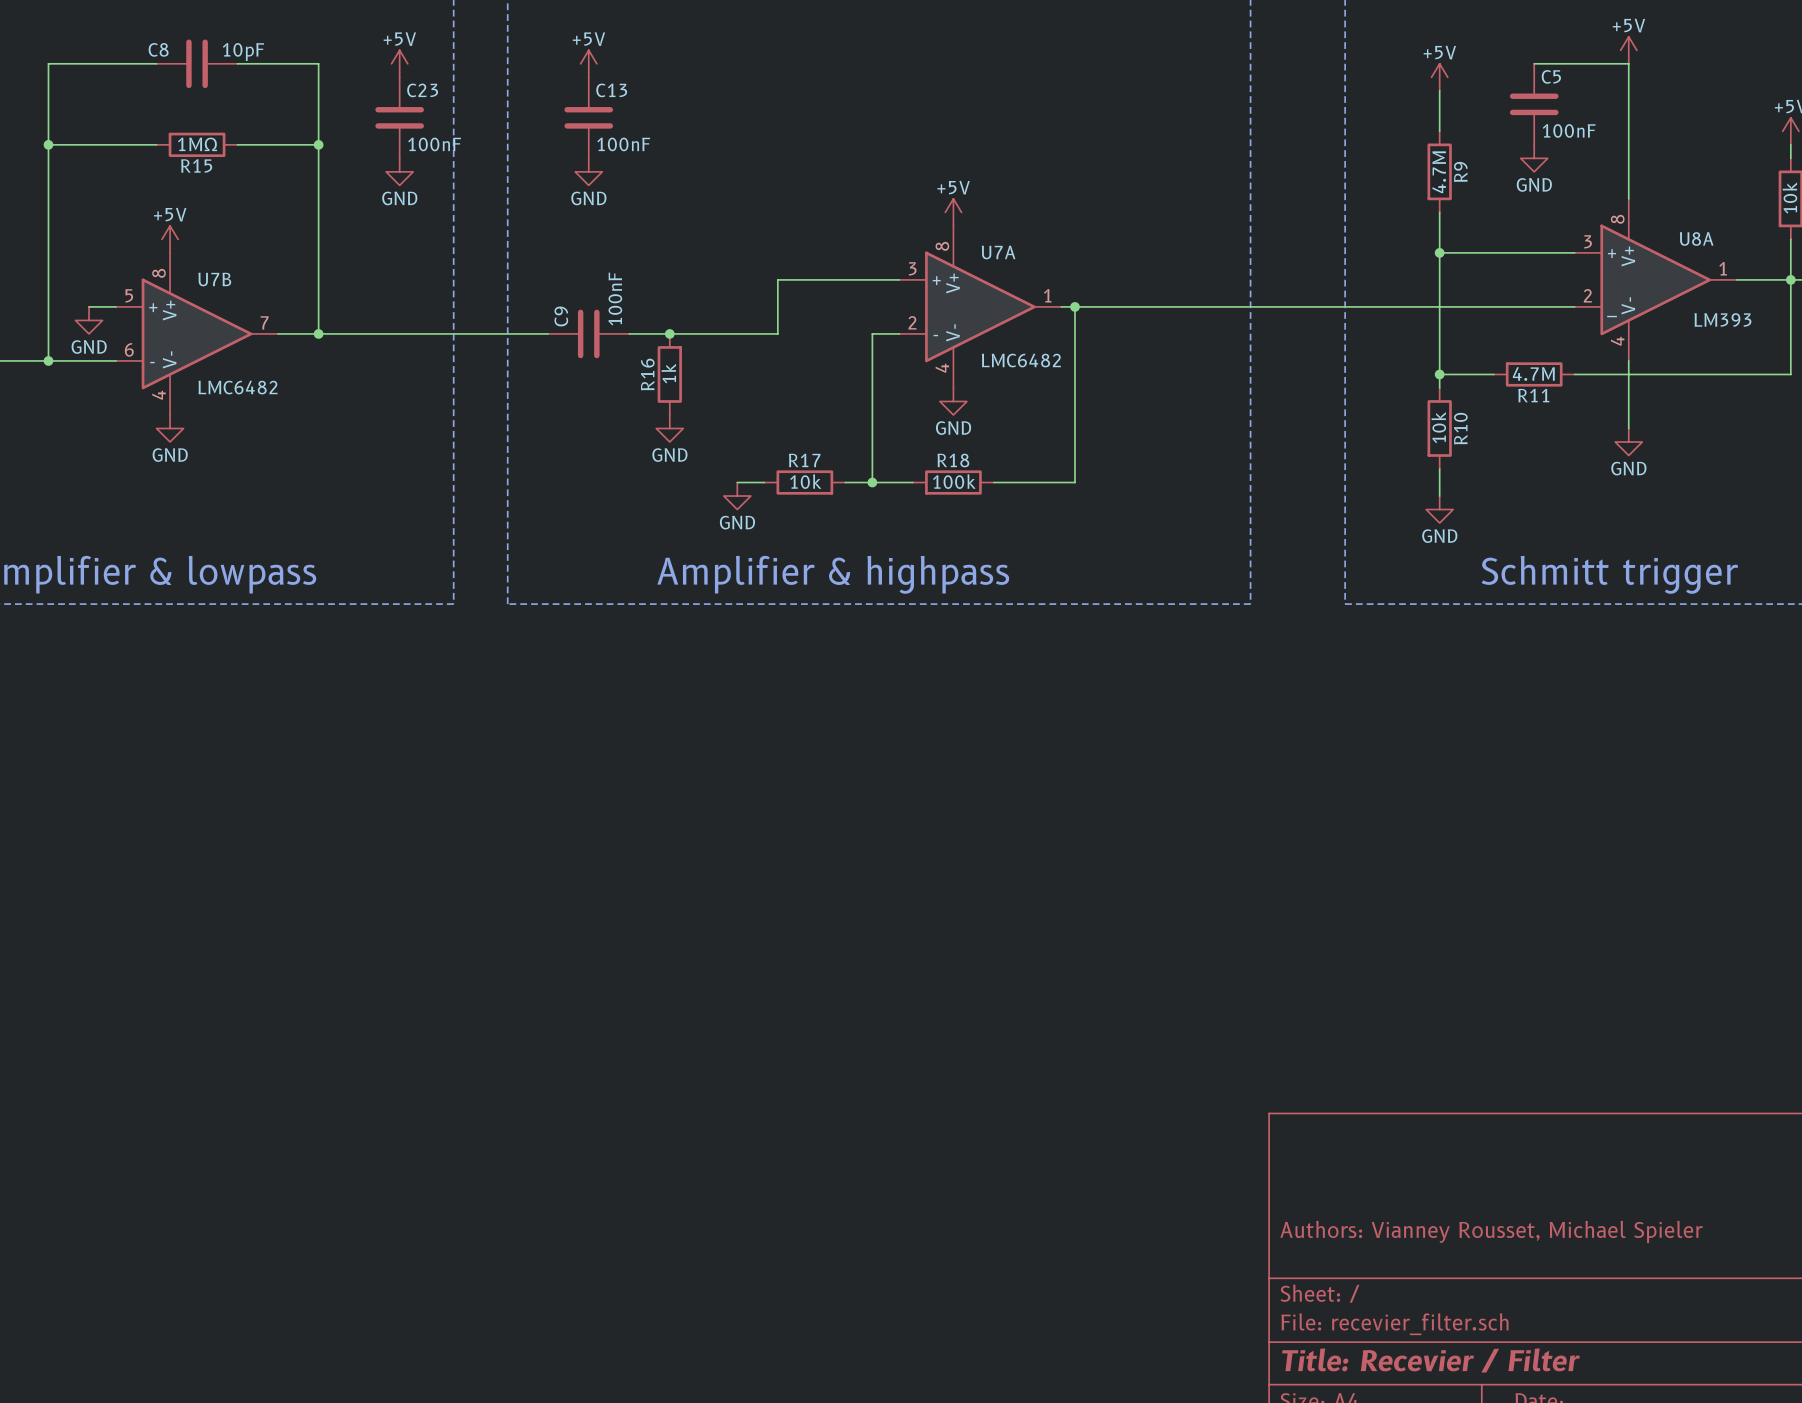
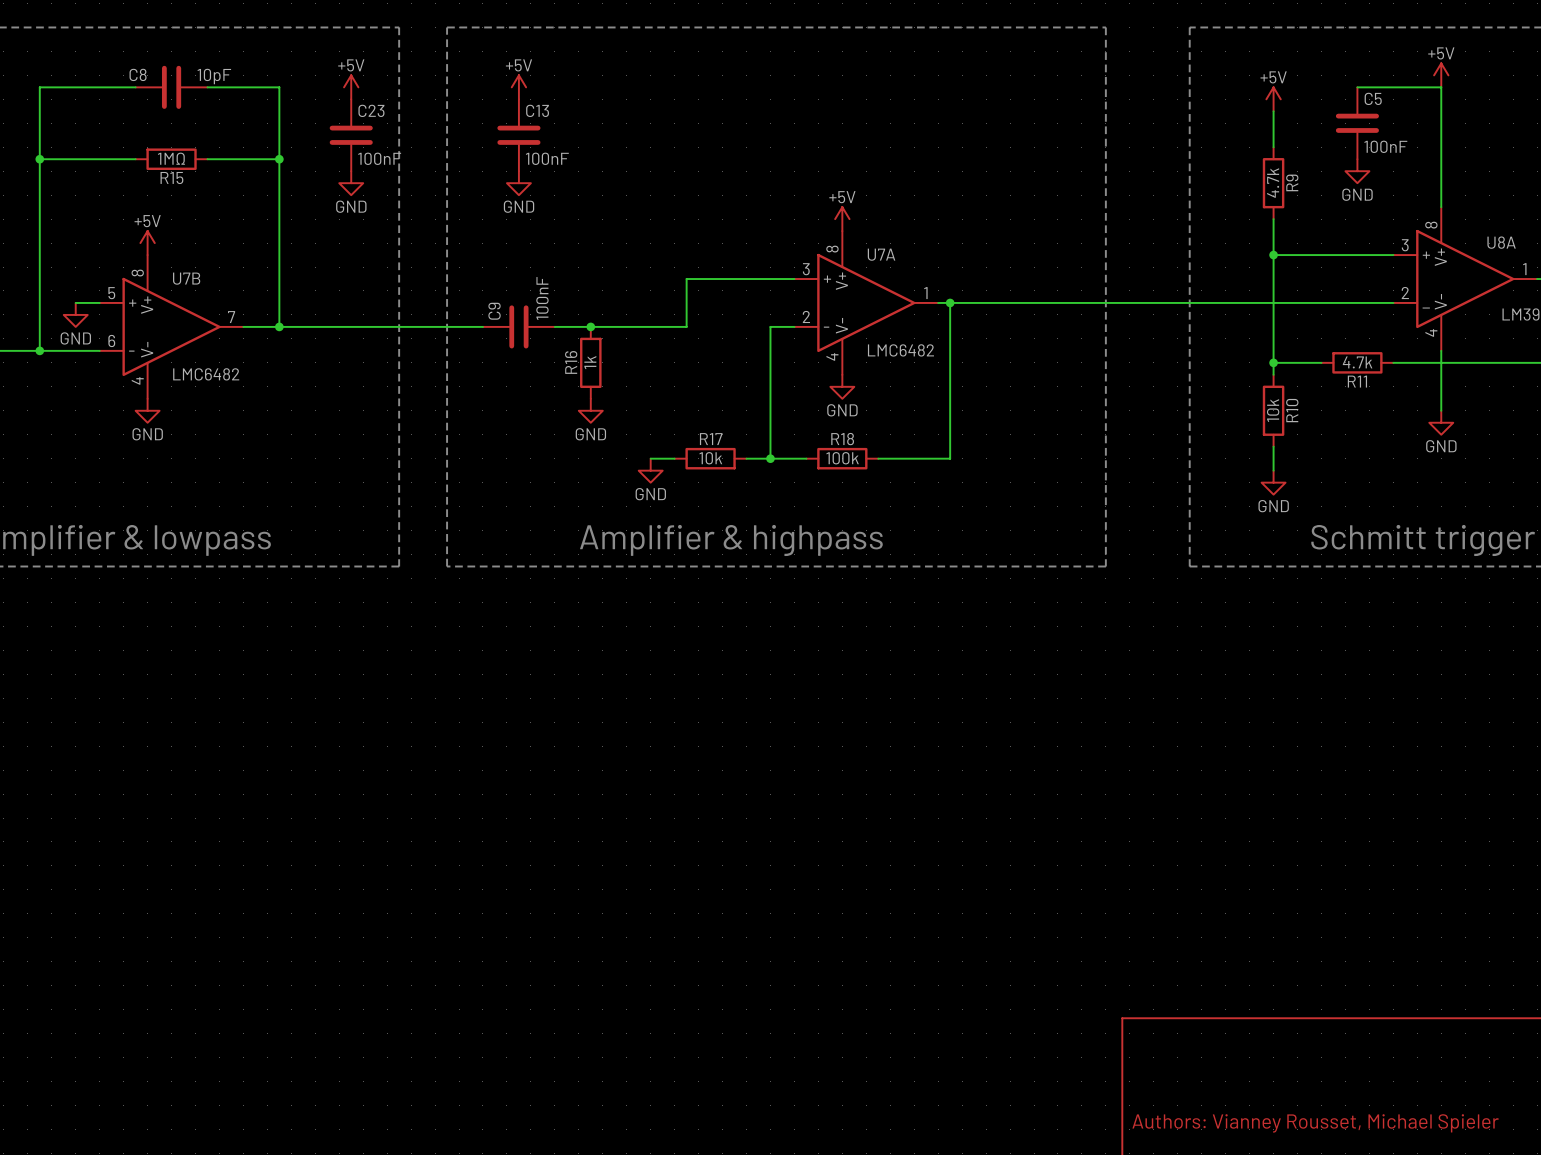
R9 value: 4.7M (1439, 172) -> 4.7k (1273, 183)
R11 value: 4.7M (1533, 374) -> 4.7k (1357, 362)

